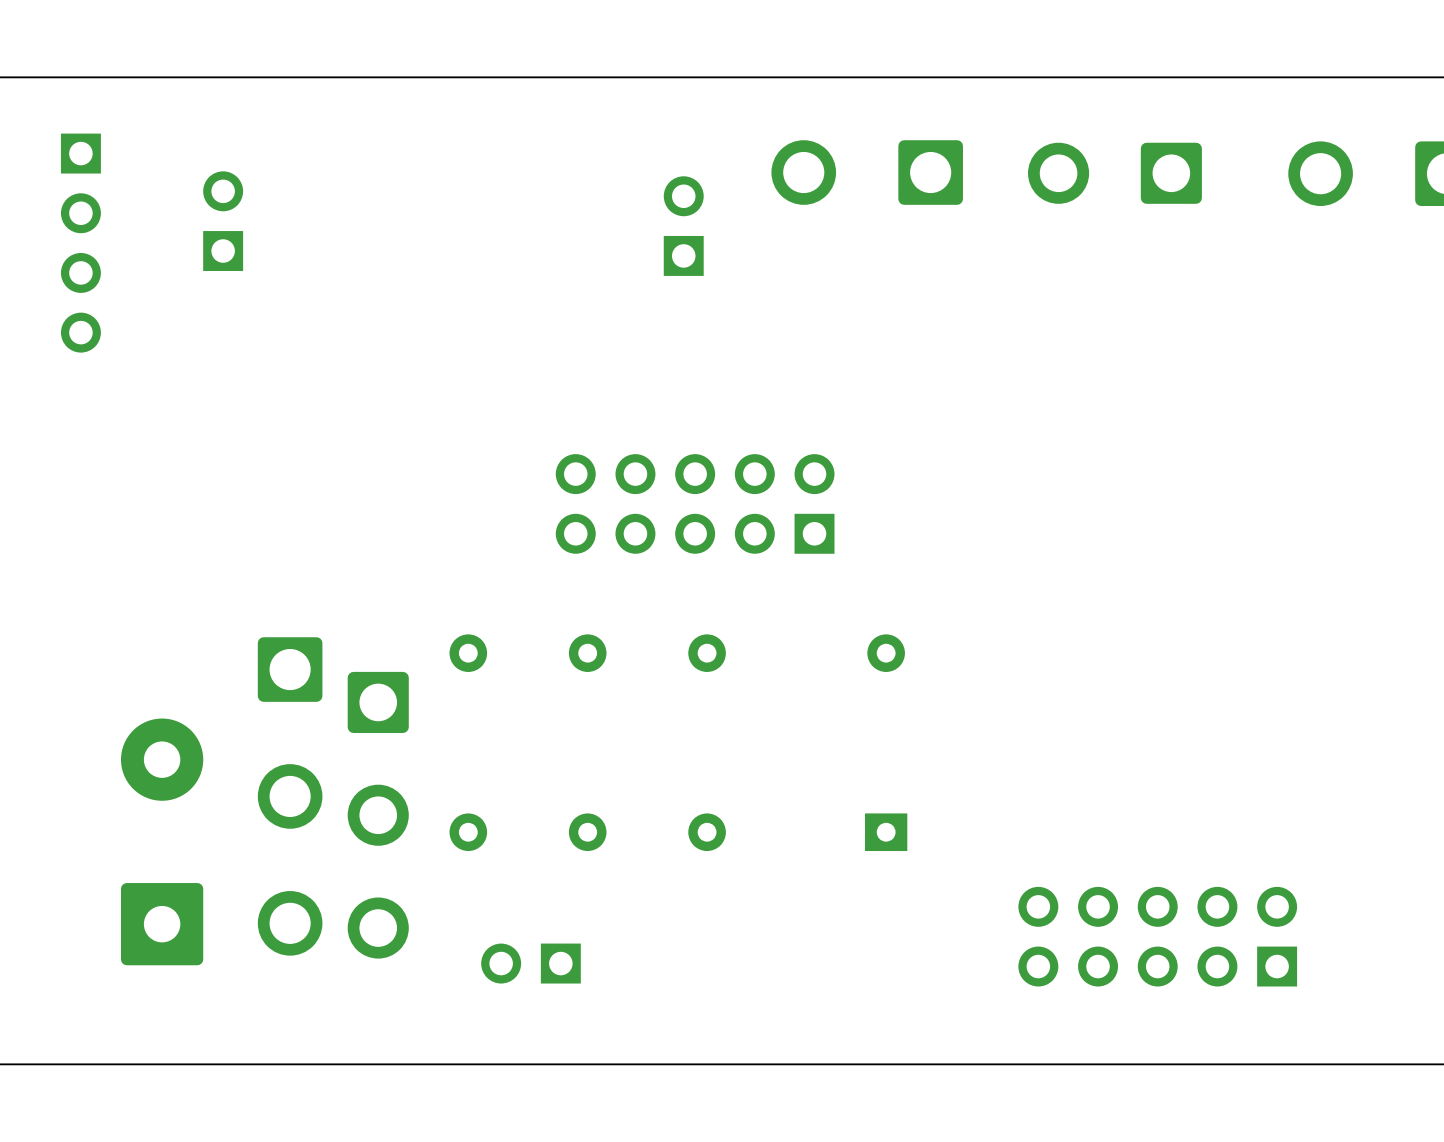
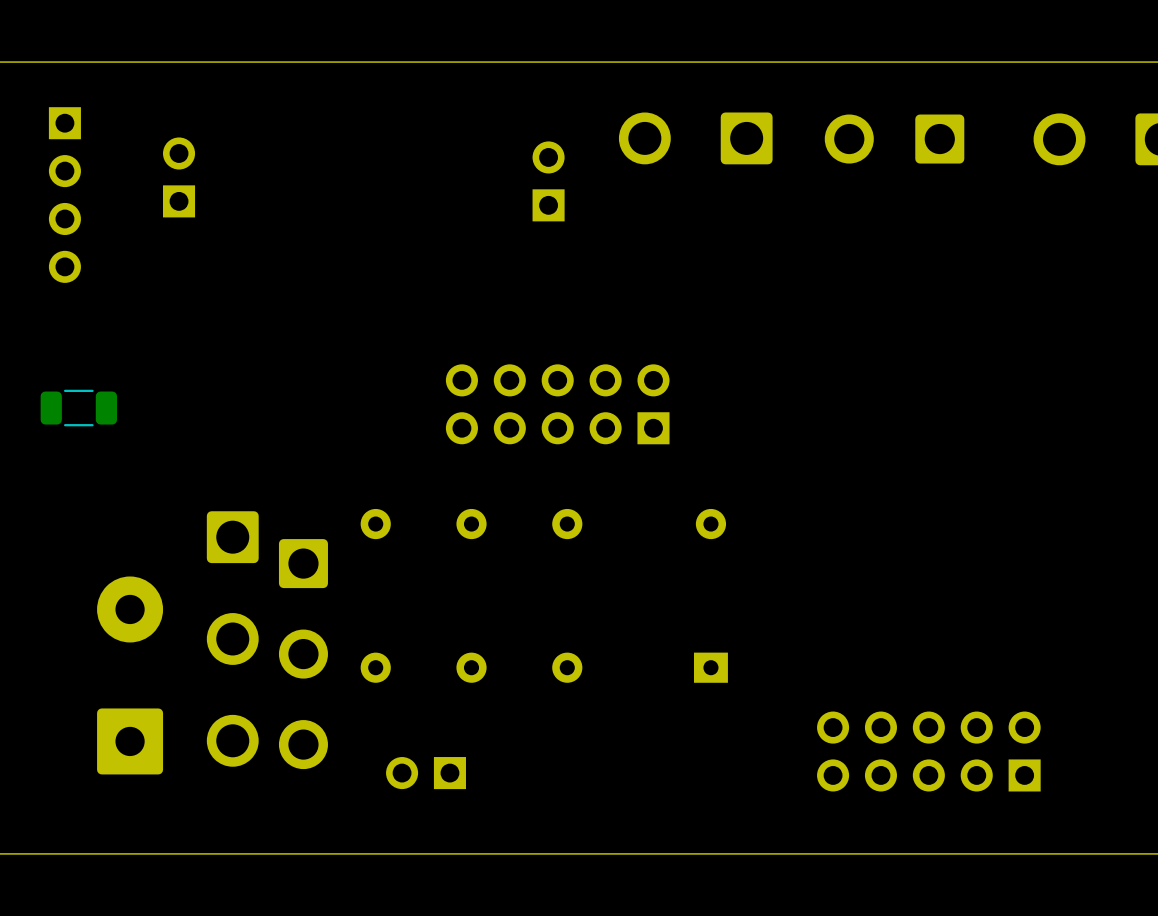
part: none -> (78, 408)

